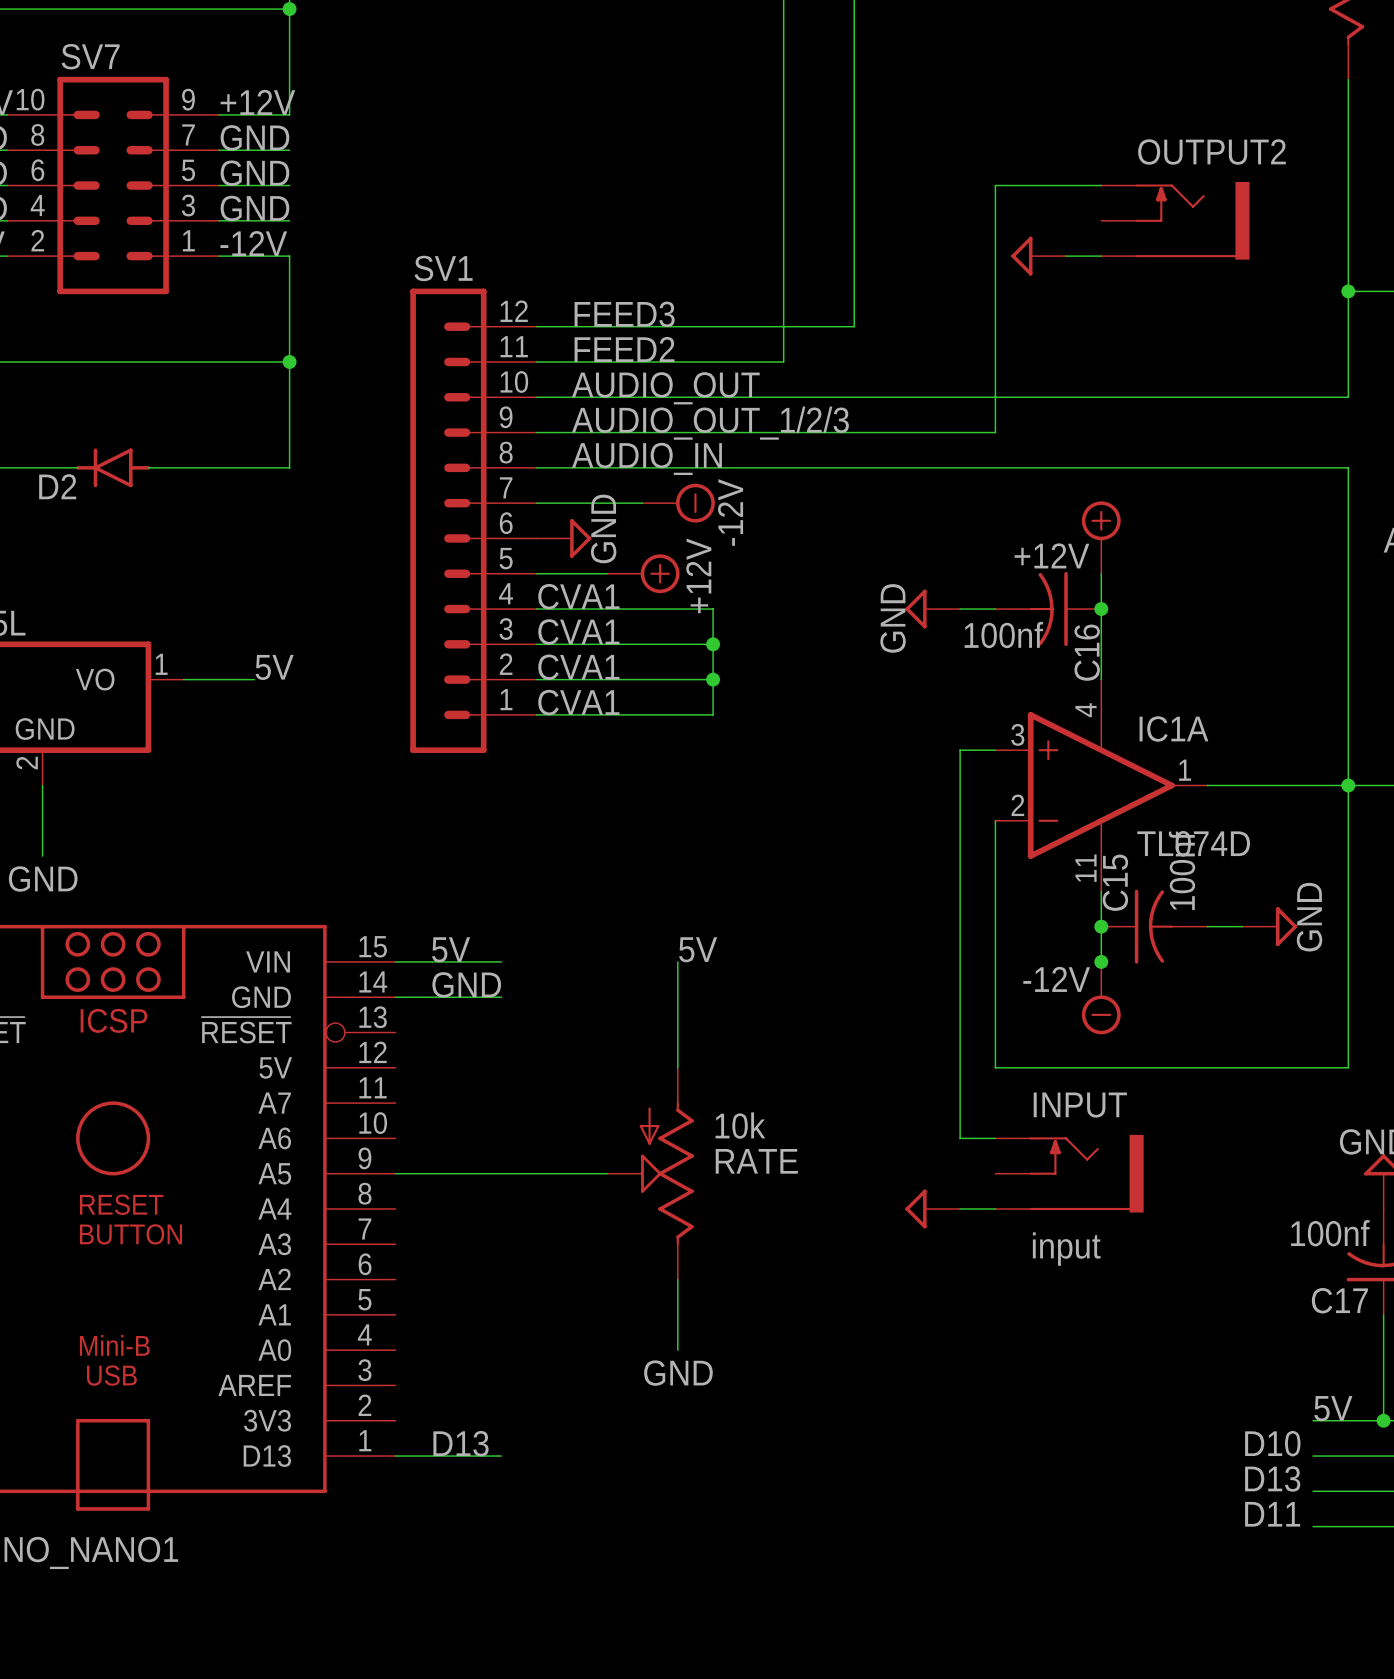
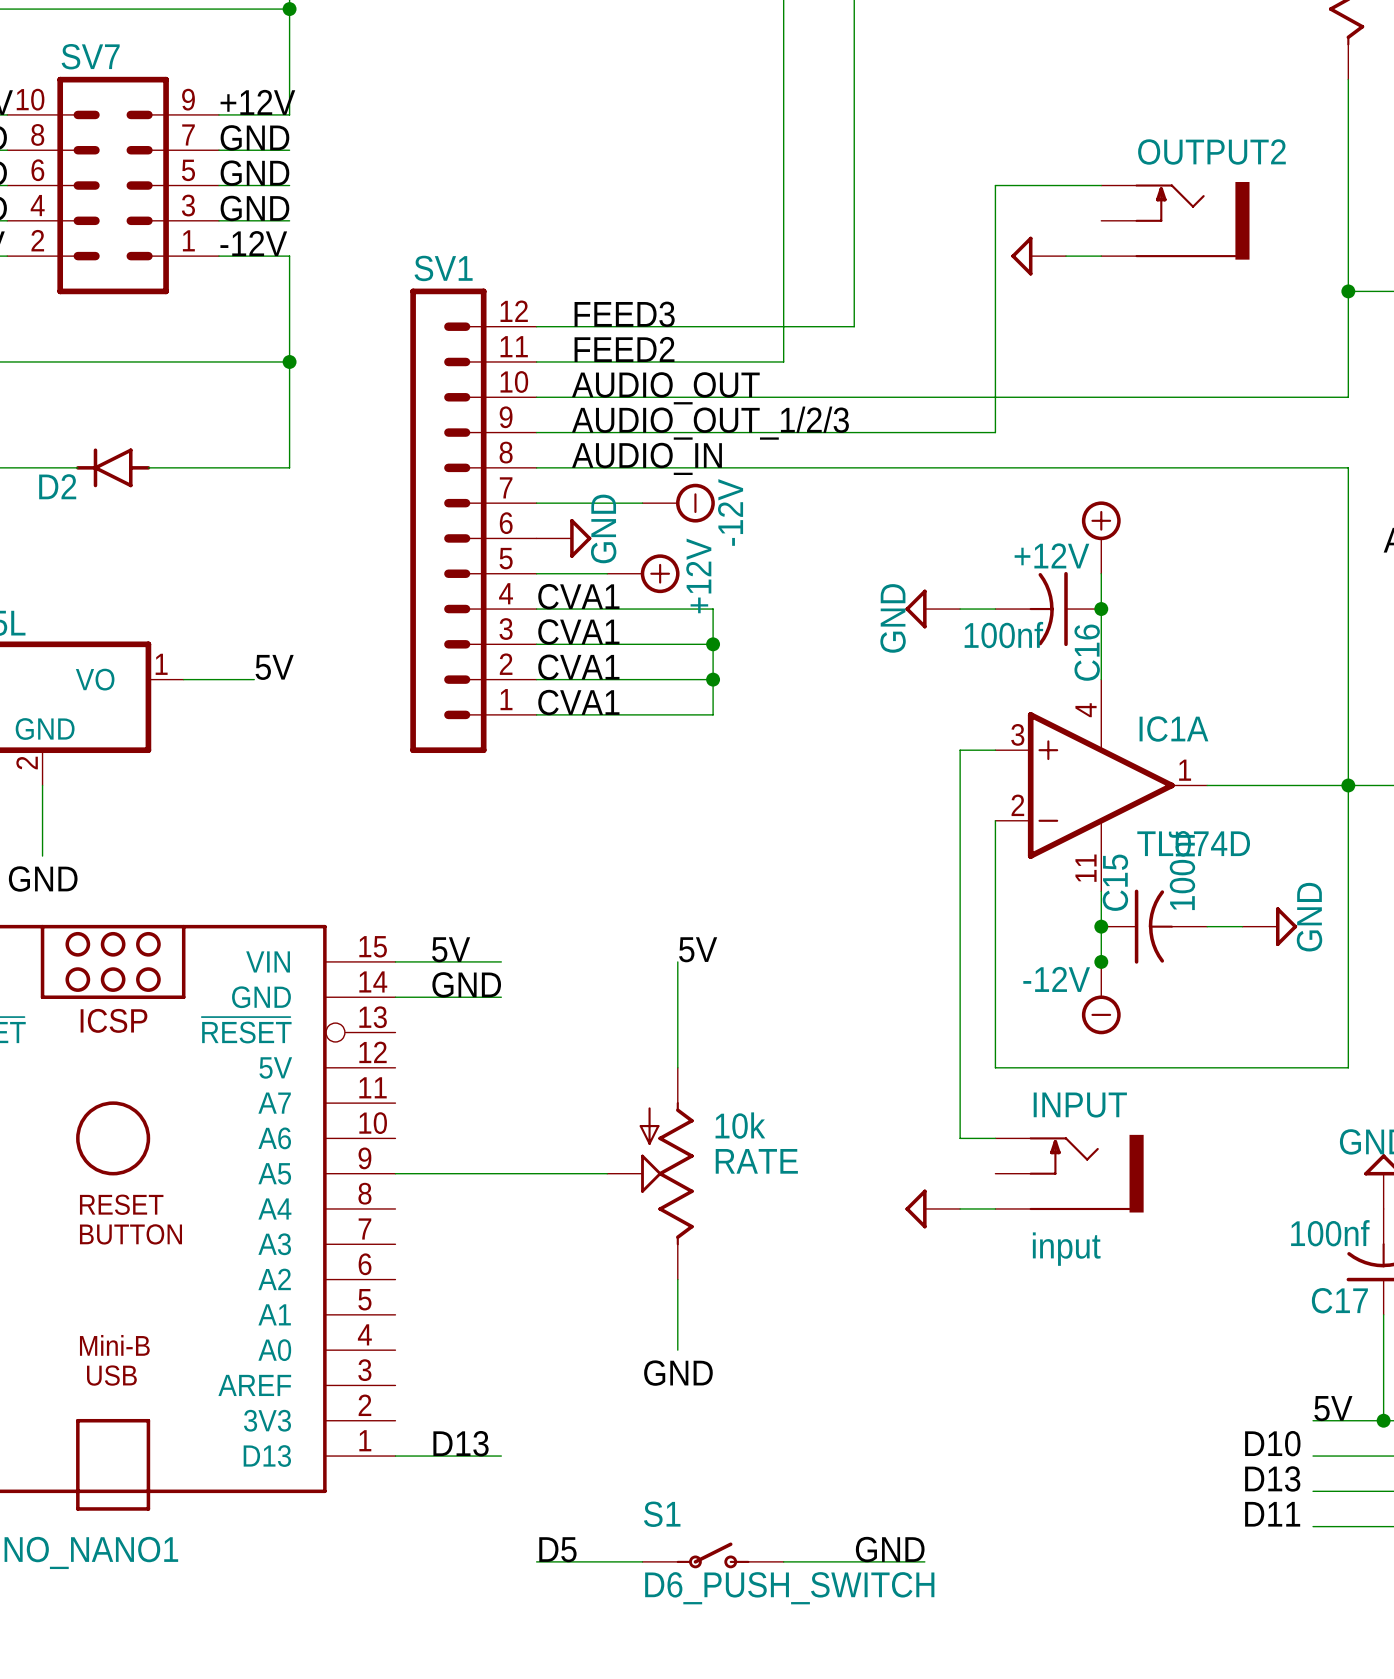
label: none -> D5 (557, 1549)
label: none -> GND (890, 1549)
S1: none -> D6_PUSH_SWITCH (713, 1555)
wire: none -> (536, 1561) (642, 1561)
wire: none -> (783, 1561) (924, 1561)

